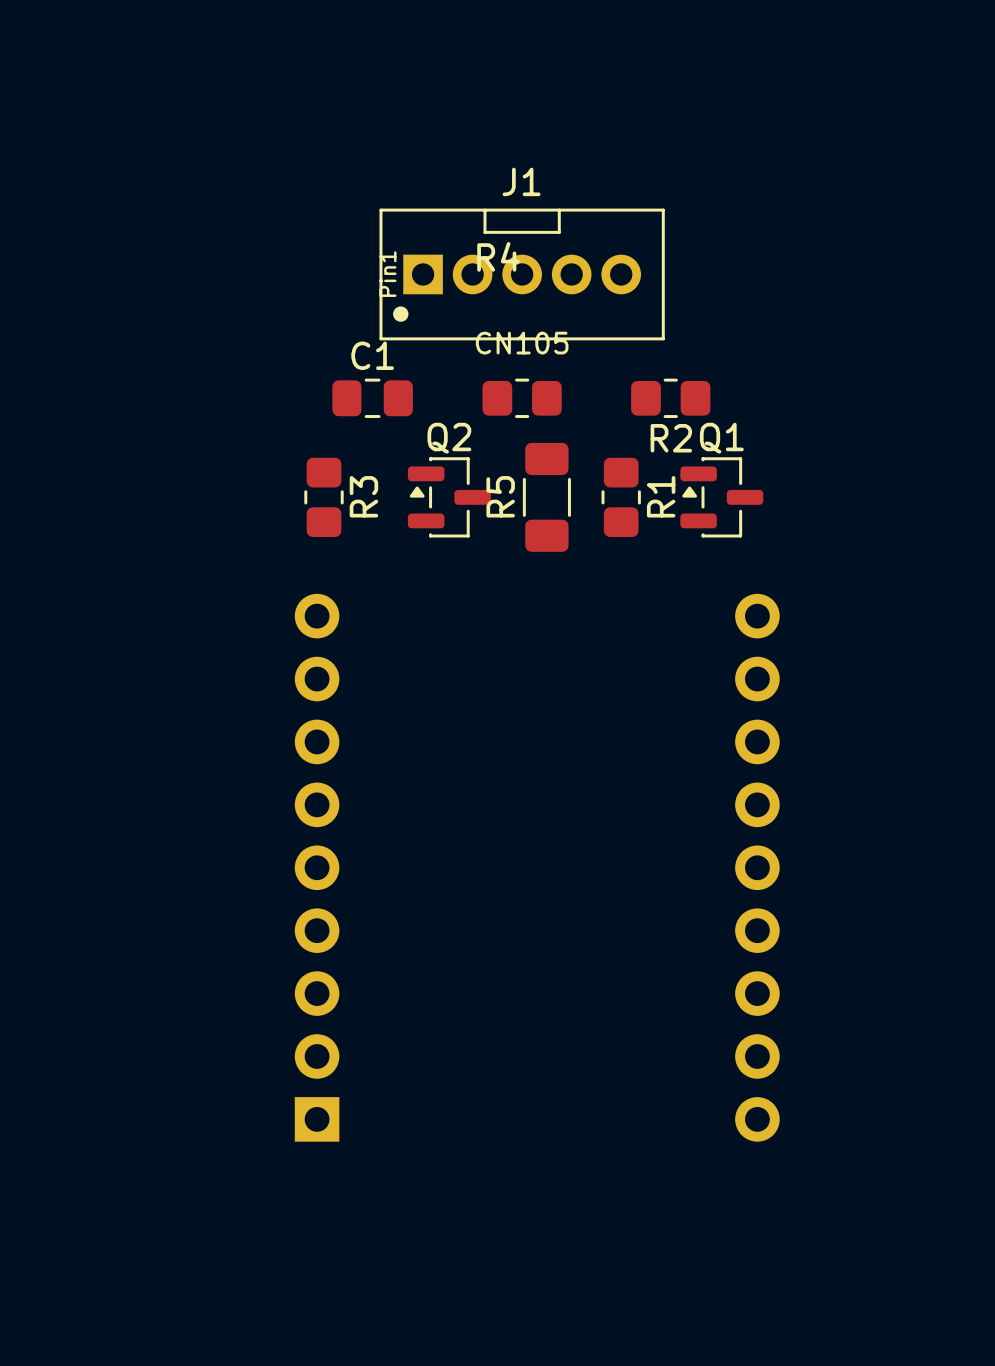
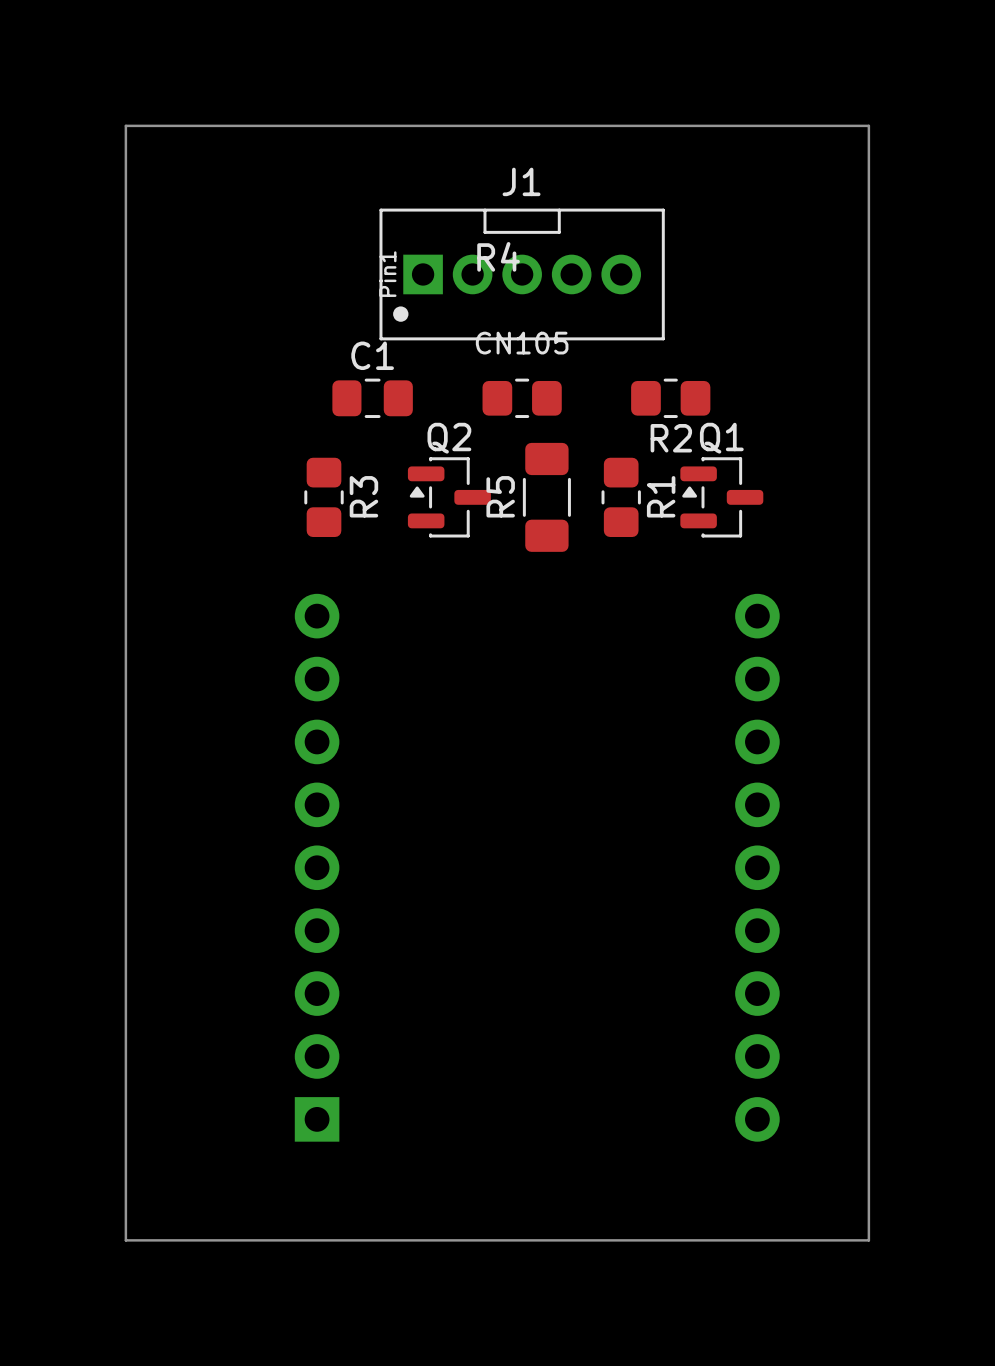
line: none -> (125, 125) (868, 125) (868, 1240) (125, 1240) (125, 125)

